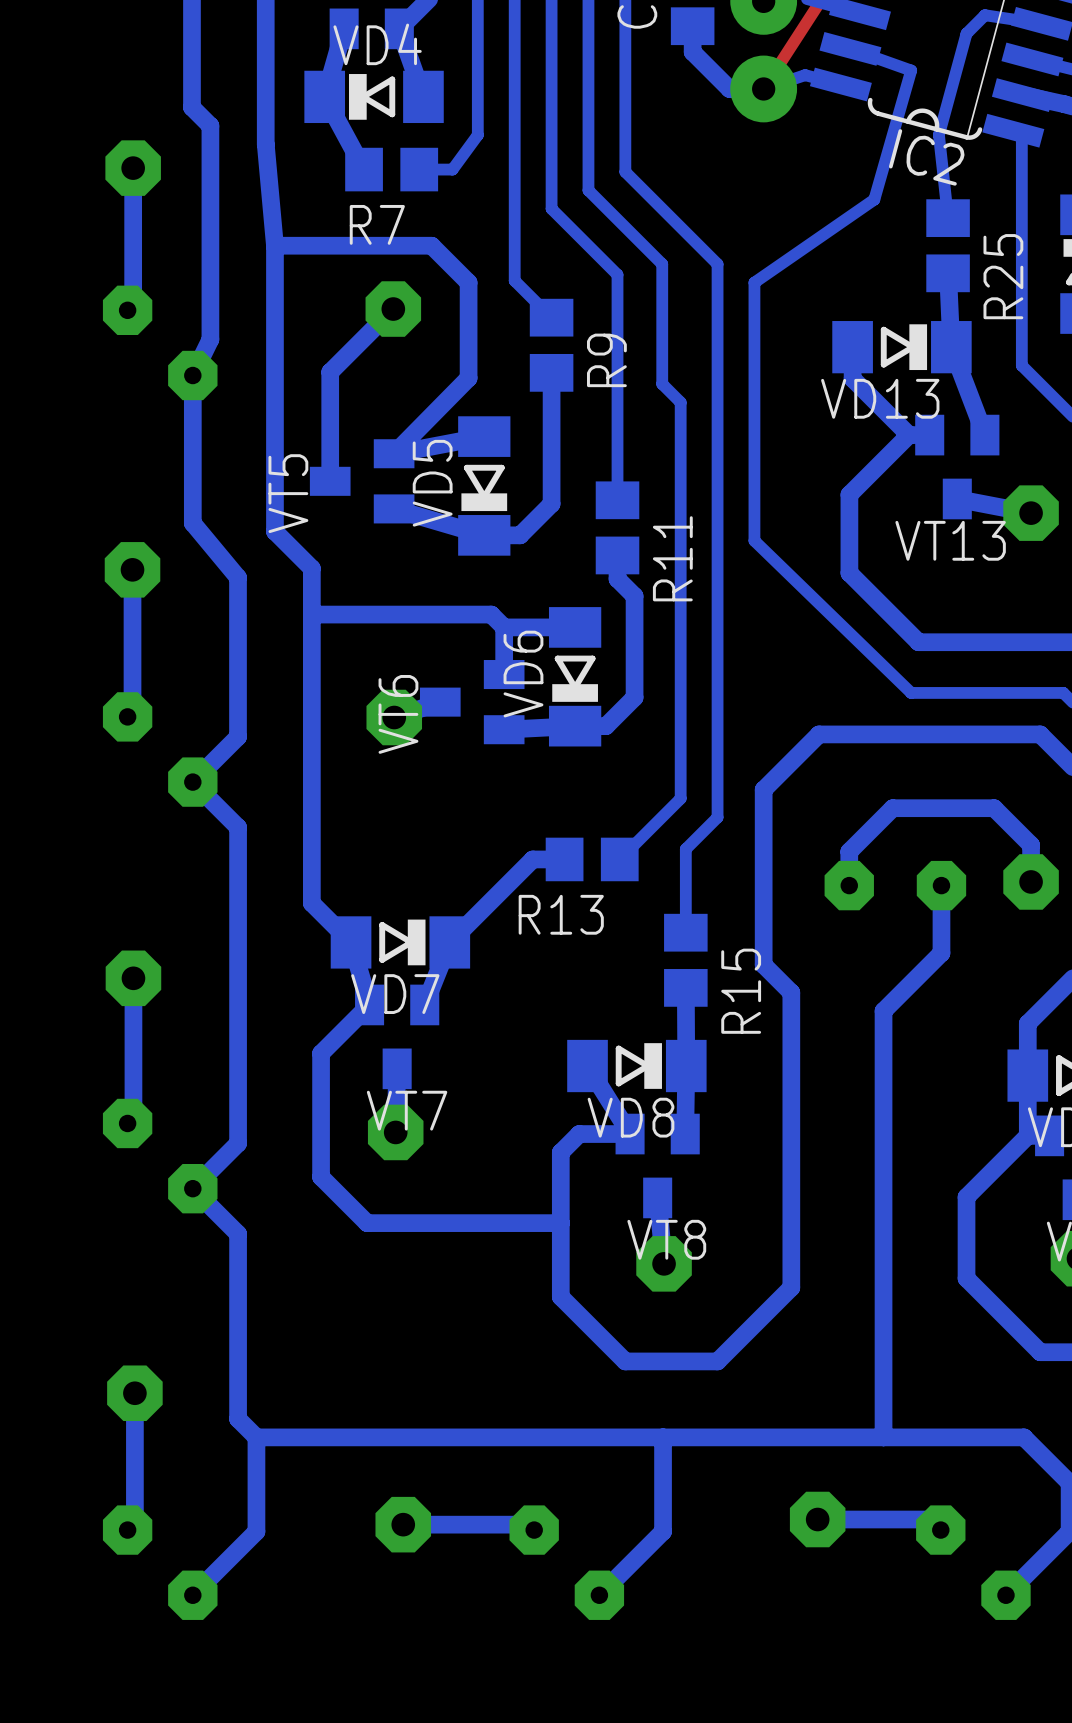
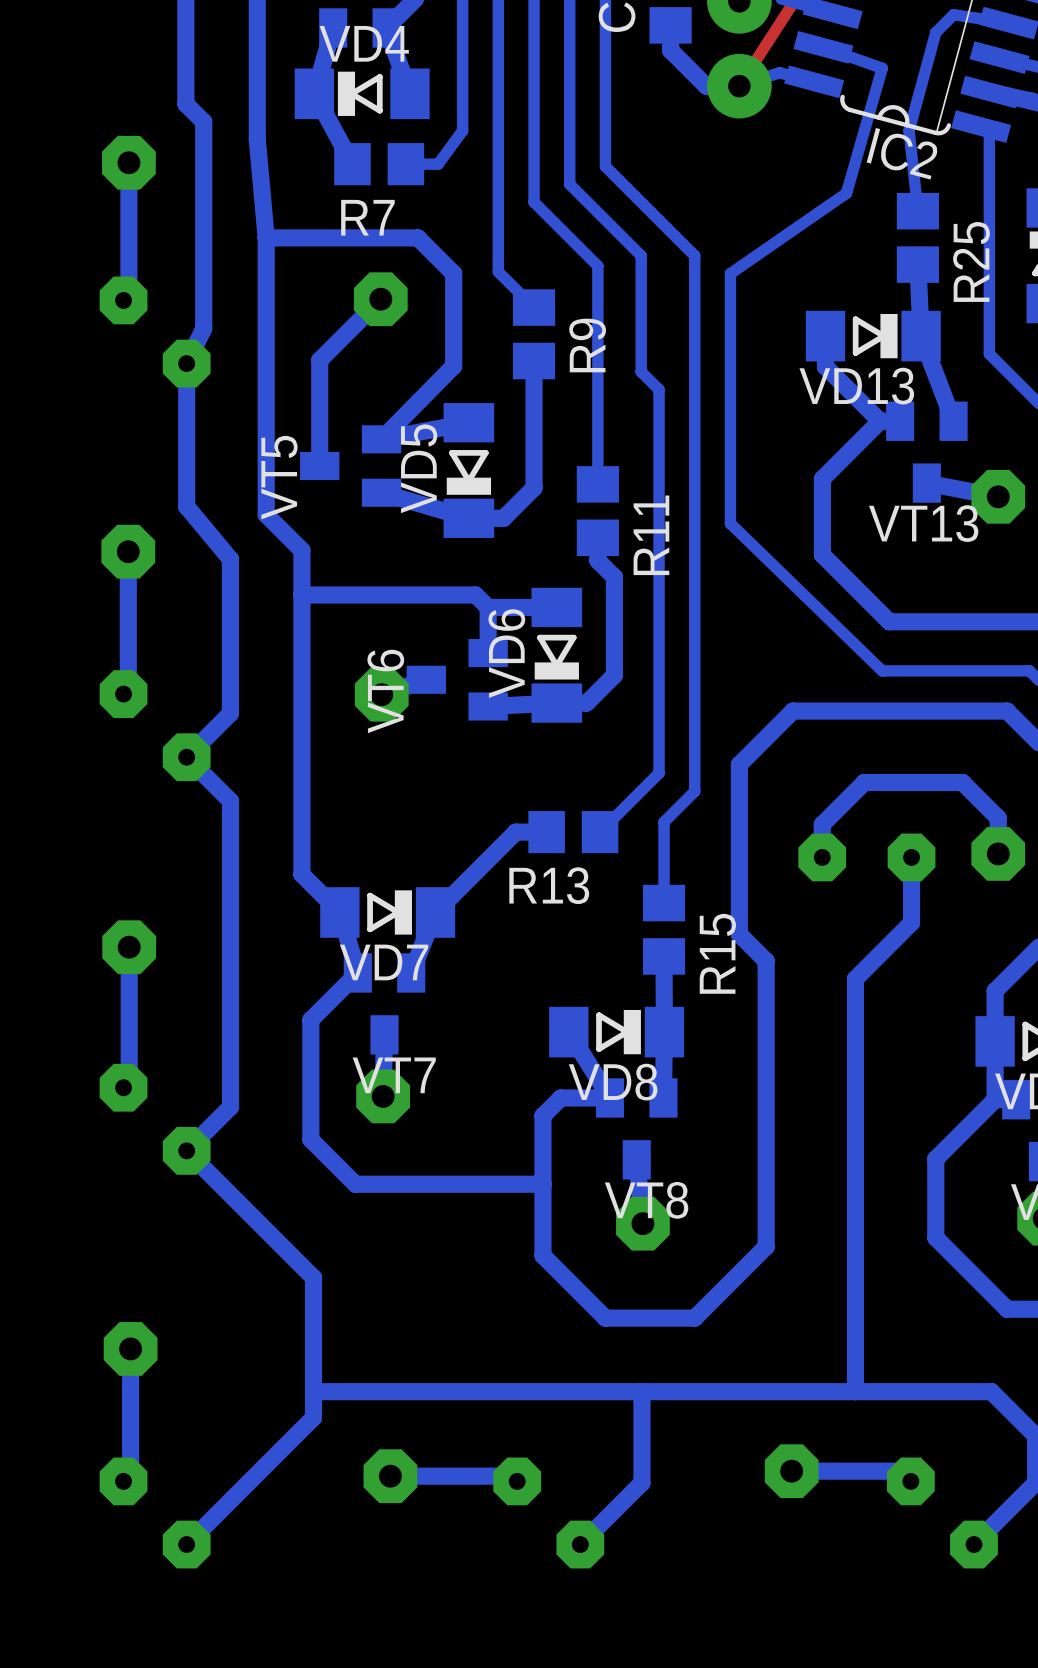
bottom track: (238, 1233) (238, 1419) (256, 1437) -> (230, 1194) (313, 1277) (313, 1417) (248, 1482)
bottom track: (256, 1437) (256, 1531) -> none
bottom track: (323, 1437) (256, 1437) -> none

